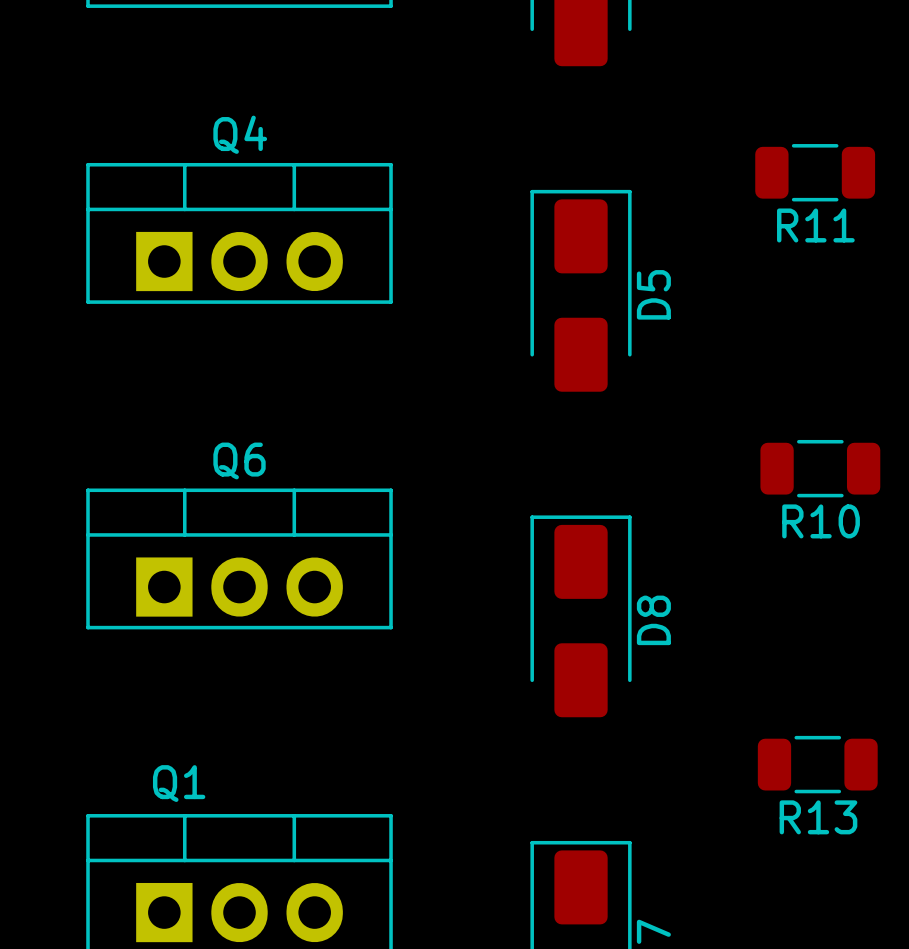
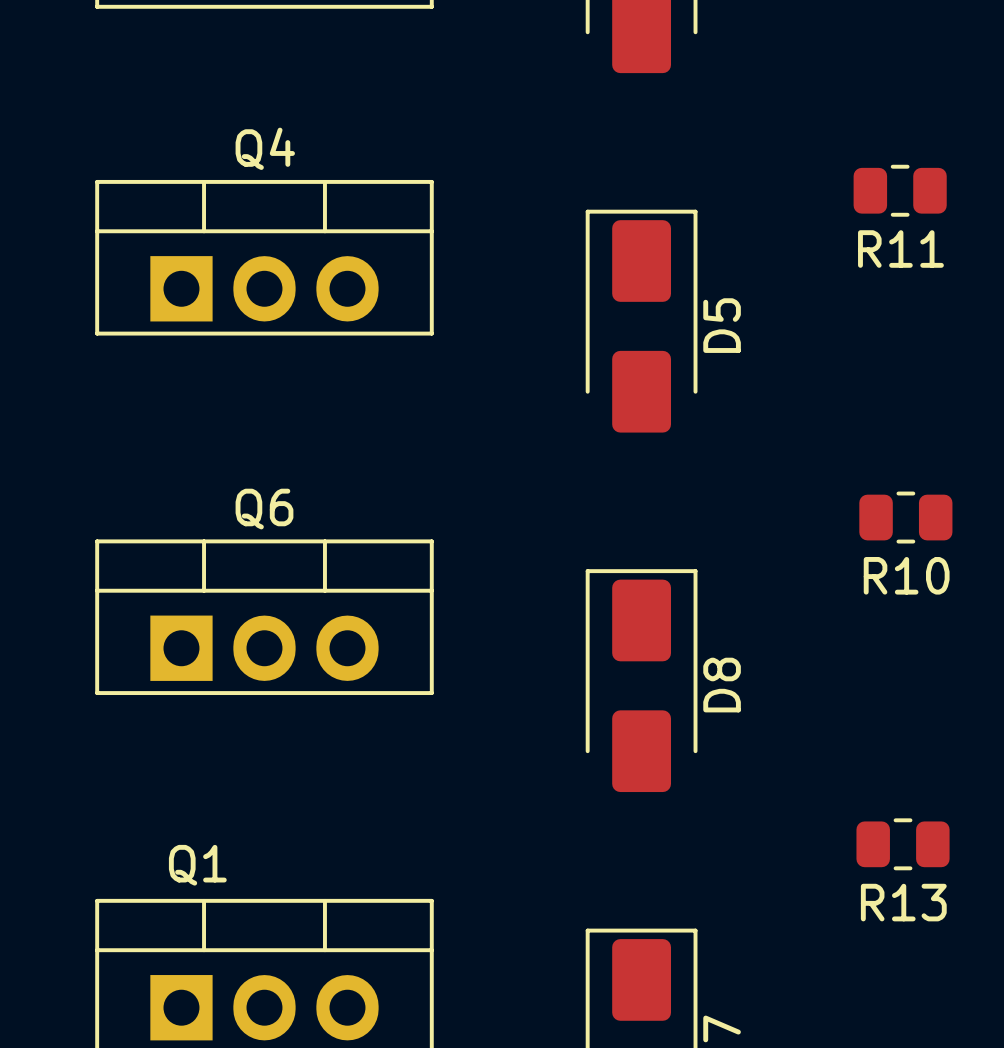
R11 footprint: [755, 144, 876, 202] -> [853, 164, 947, 217]
R10 footprint: [760, 439, 881, 498] -> [859, 491, 953, 544]
R13 footprint: [757, 735, 878, 794] -> [856, 818, 950, 871]

